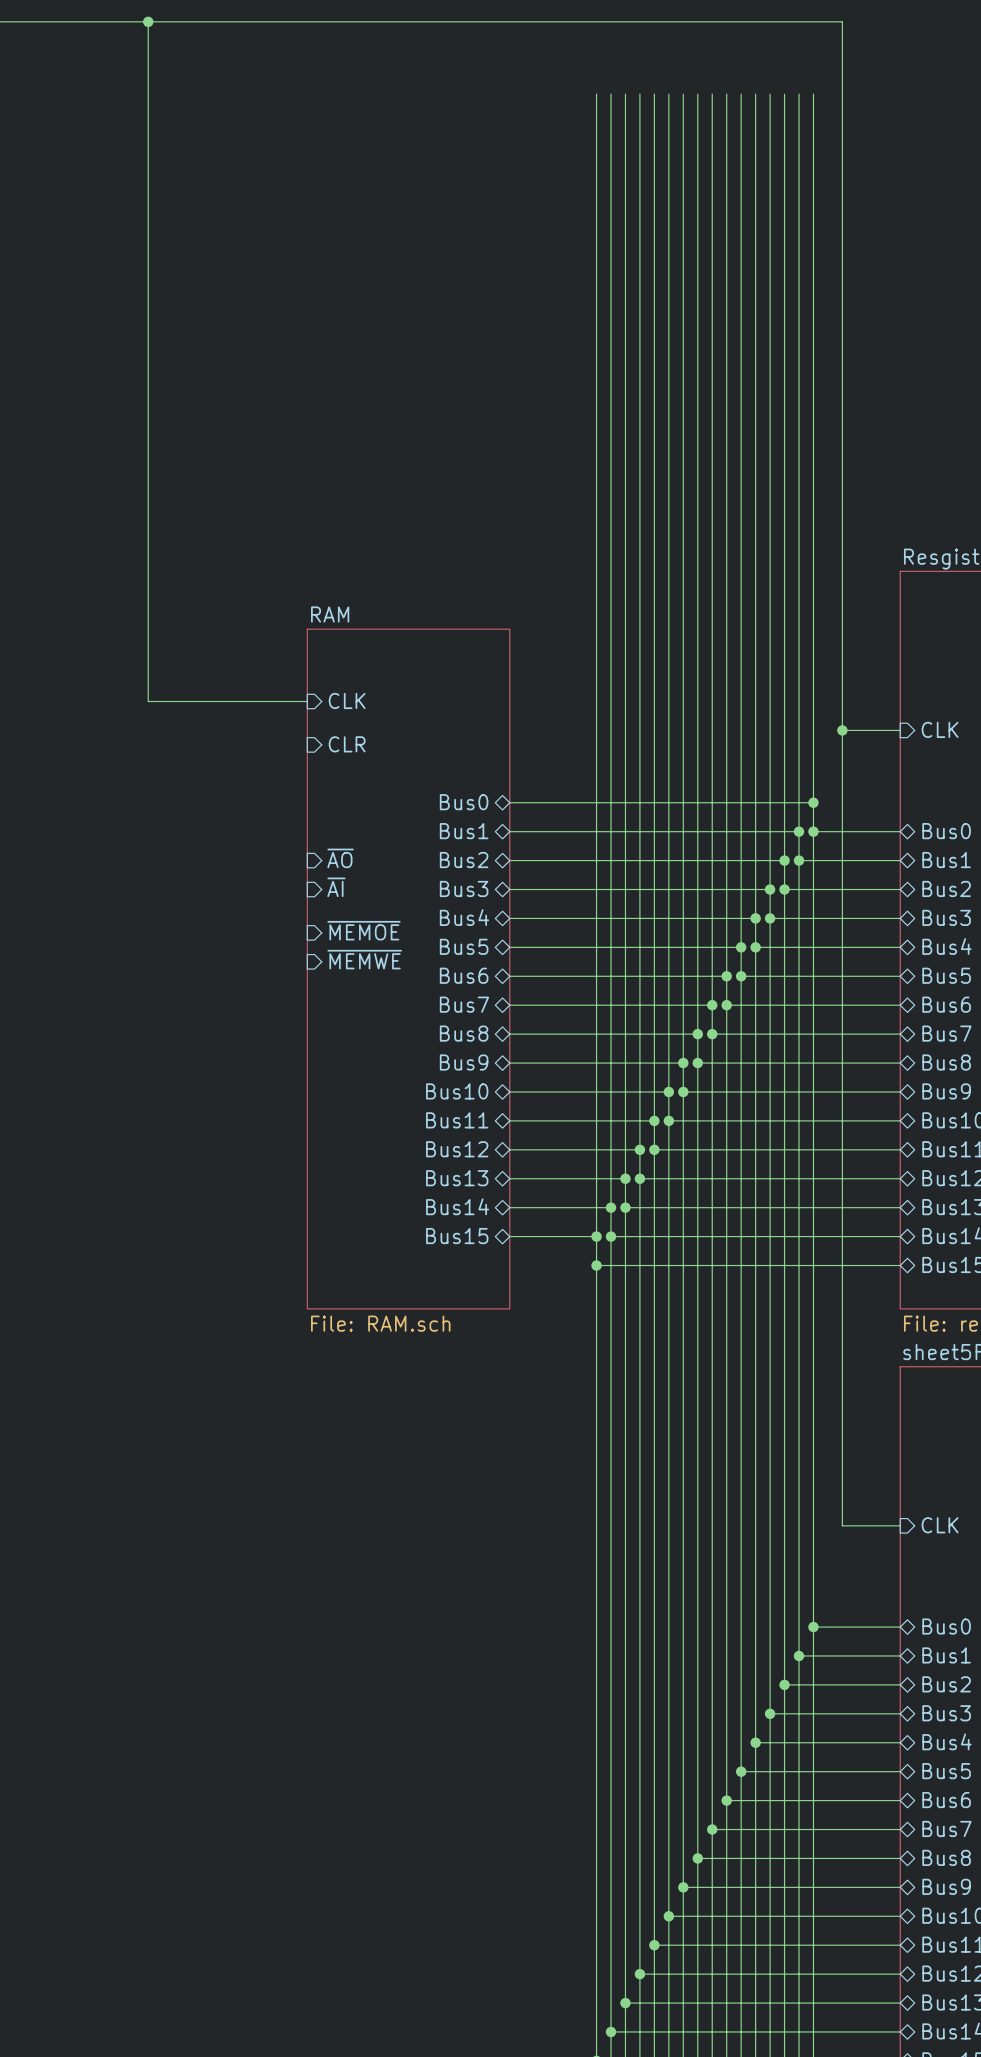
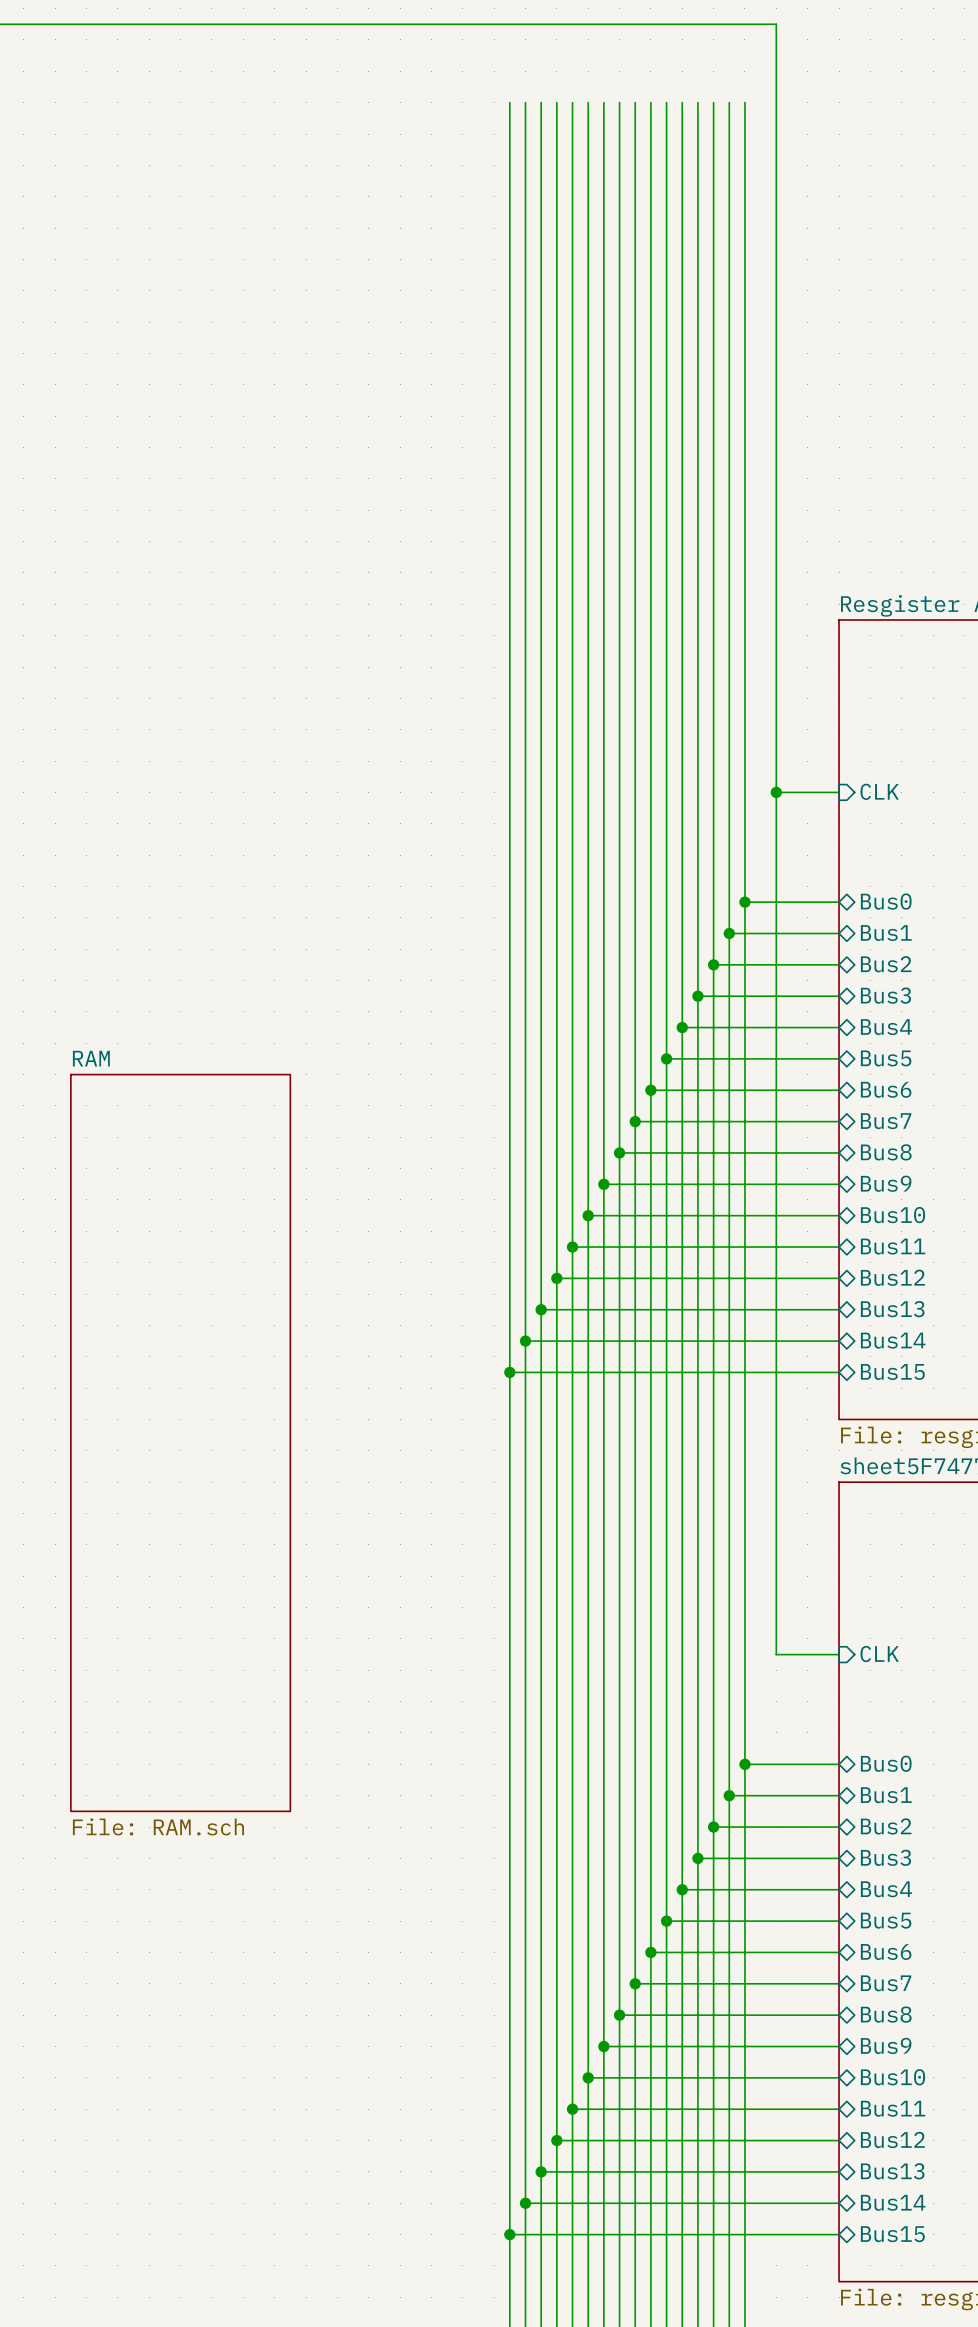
wire: (148, 21) (148, 701) (307, 701) -> none
junction: (148, 21) -> none
sheet pin: CLK (347, 700) -> none
sheet pin: CLR (347, 744) -> none
sheet pin: Bus0 (464, 802) -> none
wire: (509, 802) (813, 802) -> none
junction: (813, 802) -> none
sheet pin: Bus1 (464, 831) -> none
wire: (509, 831) (799, 831) -> none
junction: (799, 831) -> none
sheet pin: ~{AO} (340, 858) -> none
sheet pin: Bus2 (464, 860) -> none
wire: (509, 860) (784, 860) -> none
junction: (784, 860) -> none
sheet pin: ~{AI} (336, 887) -> none
sheet pin: Bus3 (464, 888) -> none
wire: (509, 889) (770, 889) -> none
junction: (770, 889) -> none
sheet pin: Bus4 (464, 917) -> none
wire: (509, 918) (755, 918) -> none
junction: (755, 918) -> none
sheet pin: ~{MEMOE} (364, 930) -> none
sheet pin: Bus5 (464, 946) -> none
wire: (509, 947) (741, 947) -> none
junction: (741, 947) -> none
sheet pin: ~{MEMWE} (364, 959) -> none
sheet RAM: File: RAM.sch (408, 969) -> none
sheet pin: Bus6 (464, 975) -> none
wire: (509, 976) (726, 976) -> none
junction: (726, 976) -> none
sheet pin: Bus7 (464, 1004) -> none
wire: (509, 1005) (712, 1005) -> none
junction: (712, 1005) -> none
sheet pin: Bus8 (464, 1033) -> none
wire: (509, 1034) (697, 1034) -> none
junction: (697, 1034) -> none
sheet pin: Bus9 (464, 1062) -> none
wire: (509, 1063) (683, 1063) -> none
junction: (683, 1063) -> none
sheet pin: Bus10 (457, 1091) -> none
wire: (509, 1091) (668, 1091) -> none
junction: (668, 1091) -> none
sheet pin: Bus11 (457, 1120) -> none
wire: (509, 1120) (654, 1120) -> none
junction: (654, 1120) -> none
sheet pin: Bus12 (457, 1149) -> none
wire: (509, 1149) (639, 1149) -> none
junction: (639, 1149) -> none
sheet pin: Bus13 (457, 1178) -> none
wire: (509, 1178) (625, 1178) -> none
junction: (625, 1178) -> none
sheet pin: Bus14 (457, 1206) -> none
wire: (509, 1207) (611, 1207) -> none
junction: (611, 1207) -> none
sheet pin: Bus15 (457, 1236) -> none
wire: (509, 1236) (596, 1236) -> none
junction: (596, 1236) -> none
sheet RAM: none -> File: RAM.sch (180, 1442)

